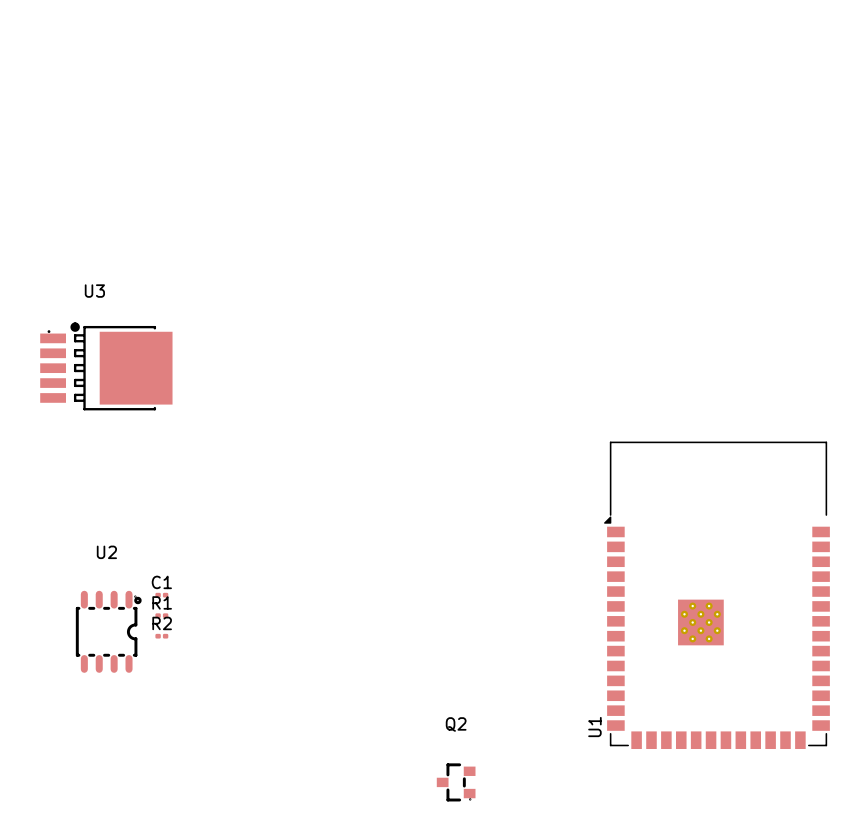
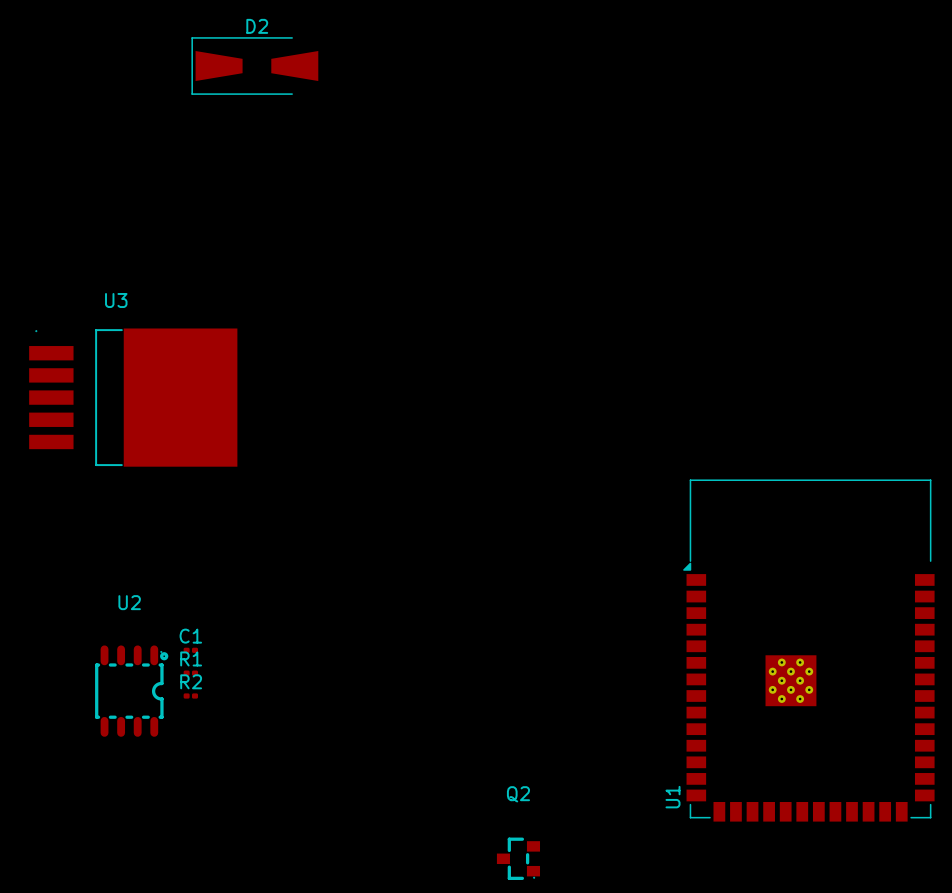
D2: none -> (254, 66)
U3 footprint: [40, 322, 173, 411] -> [29, 328, 238, 467]

